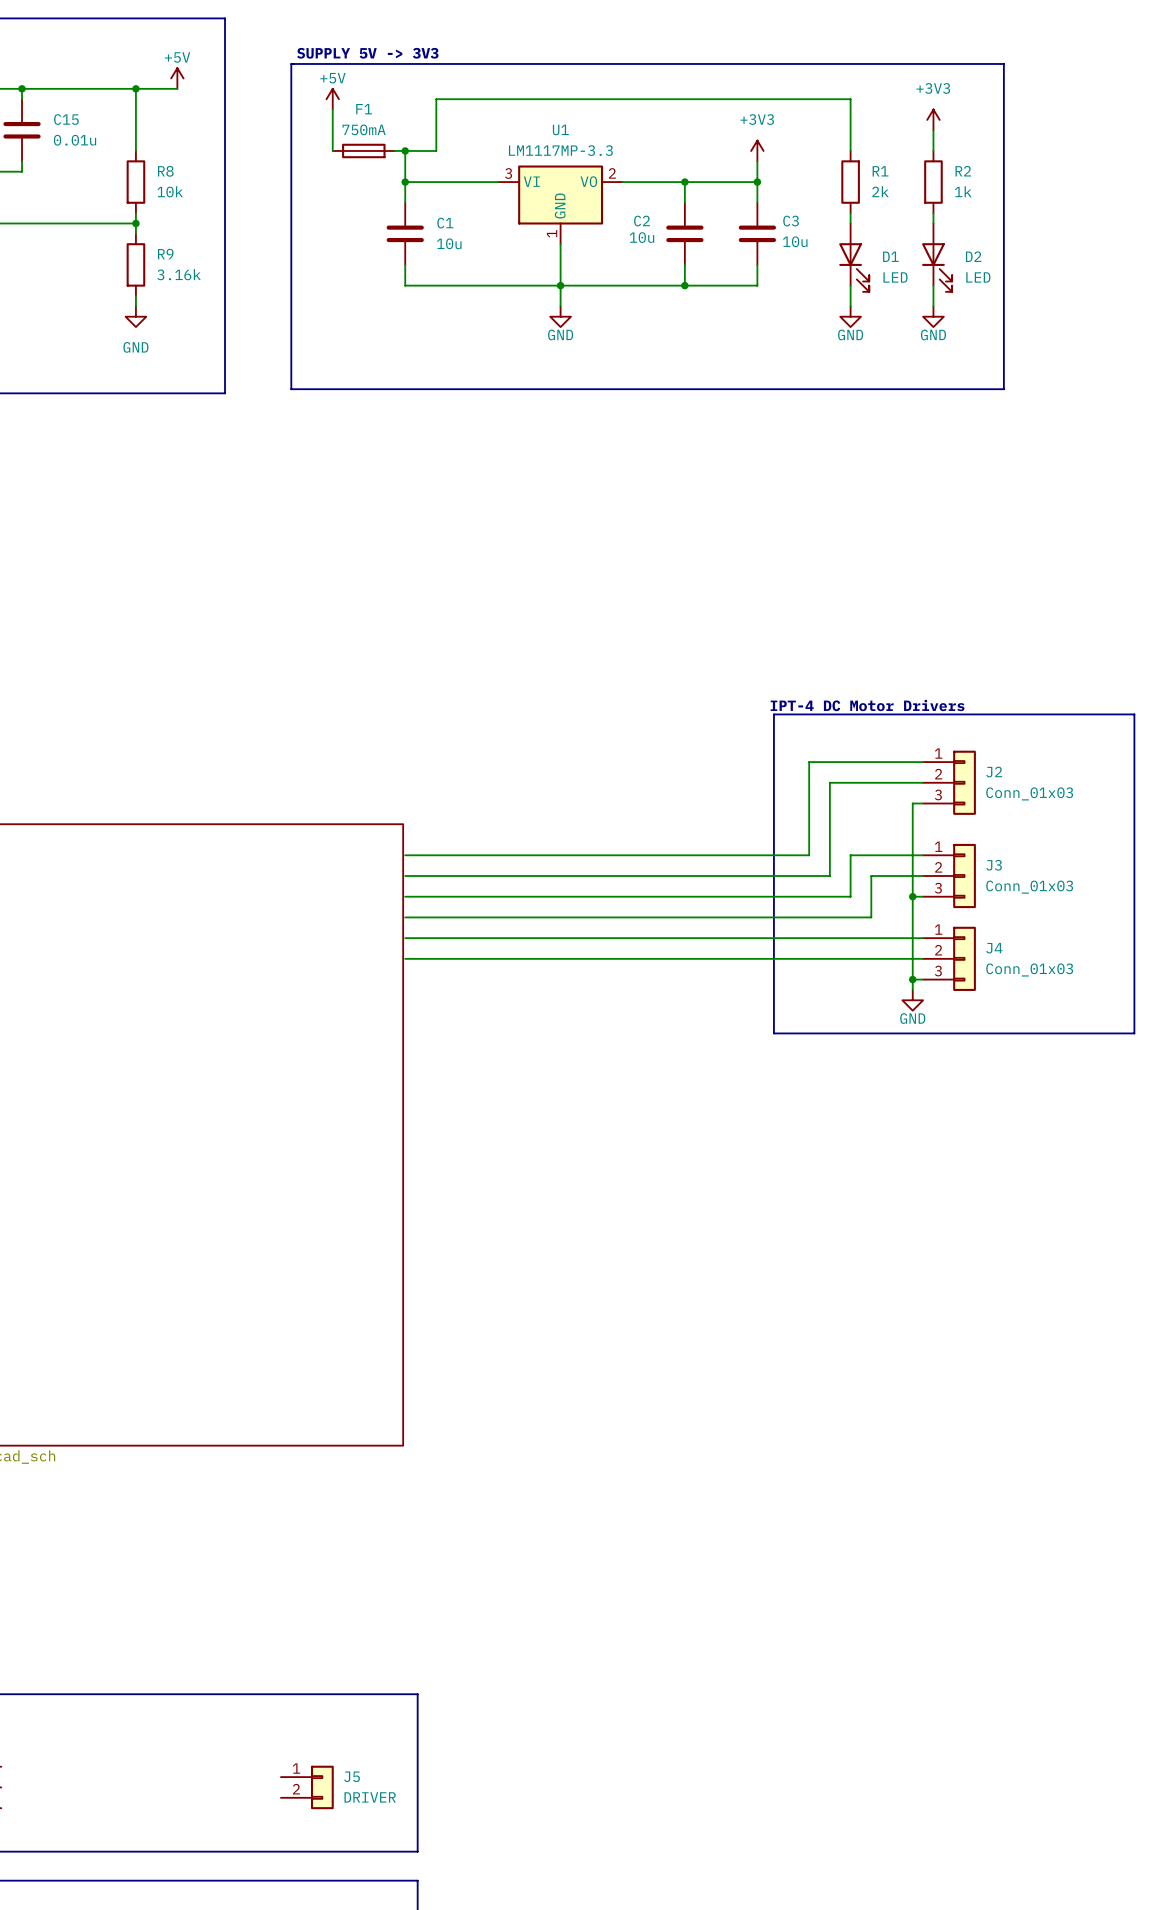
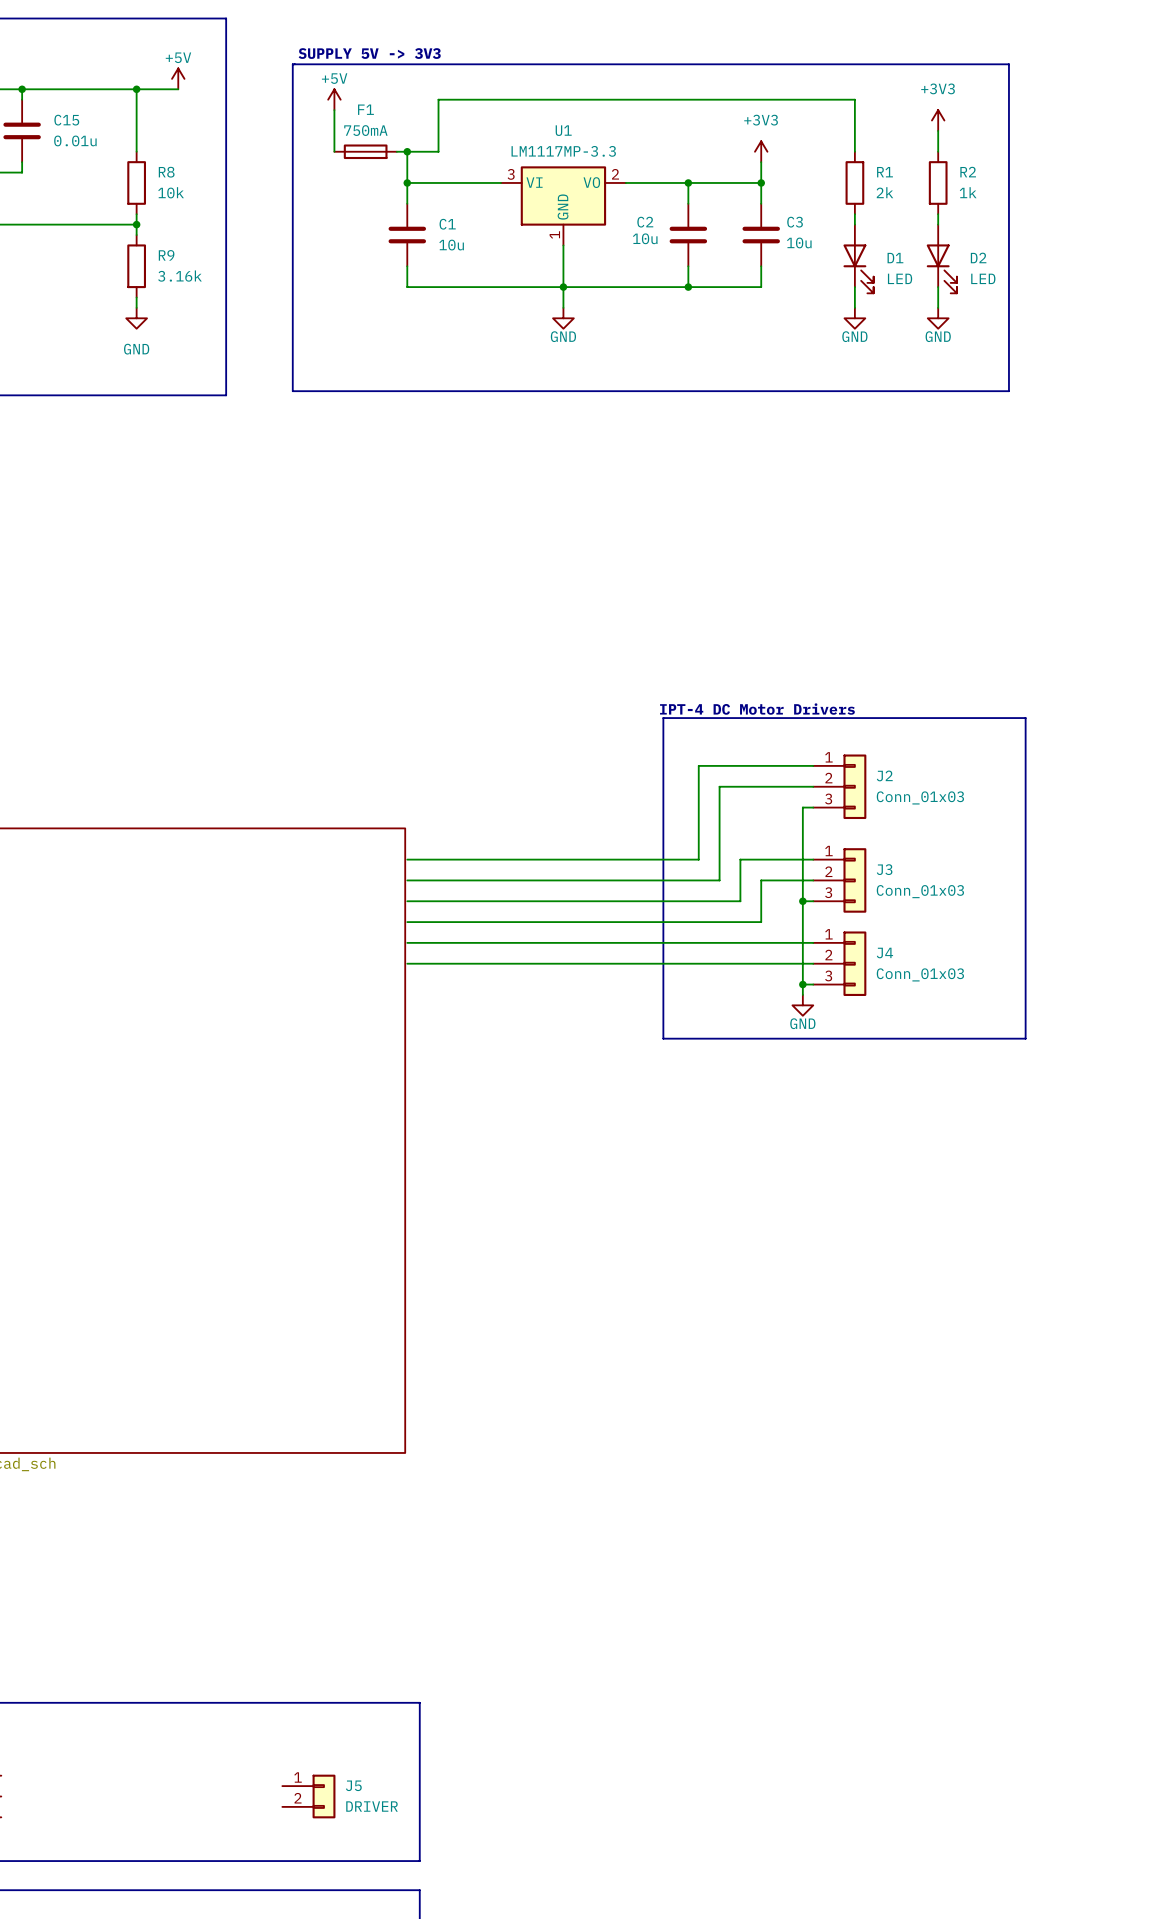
text position: IPT-4 DC Motor Drivers (867, 705) -> IPT-4 DC Motor Drivers (757, 709)
line: (773, 714) (773, 1033) -> (777, 718) (663, 718) (663, 1038) (777, 1038)
line: (1020, 714) (1134, 714) (1134, 1033) (1020, 1033) -> (1025, 718) (1025, 1038)
wire: (923, 762) (809, 762) (809, 855) -> (813, 765) (698, 765) (698, 859)
wire: none -> (813, 786) (719, 786) (719, 880)
wire: (923, 782) (829, 782) (829, 876) (809, 876) -> none
J2 position: (949, 782) -> (839, 786)
wire: (923, 803) (912, 803) (912, 989) -> (813, 807) (802, 807) (802, 994)
wire: (695, 855) (736, 855) -> (740, 901) (740, 859)
wire: (923, 855) (850, 855) (850, 896) (809, 896) -> none
wire: (715, 876) (757, 876) -> (761, 922) (761, 880)
wire: (923, 876) (871, 876) (871, 917) (757, 917) -> none
J3 position: (949, 876) -> (839, 880)
wire: (736, 896) (798, 896) -> none
junction: none -> (802, 901)
wire: (912, 896) (923, 896) -> none
junction: (912, 896) -> none
wire: (809, 938) (923, 938) -> none
wire: (809, 958) (923, 958) -> none
J4 position: (949, 958) -> (839, 963)
junction: none -> (802, 984)
wire: (912, 979) (923, 979) -> (802, 984) (813, 984)
junction: (912, 979) -> none
power symbol position: GND (912, 1000) -> GND (802, 1005)

